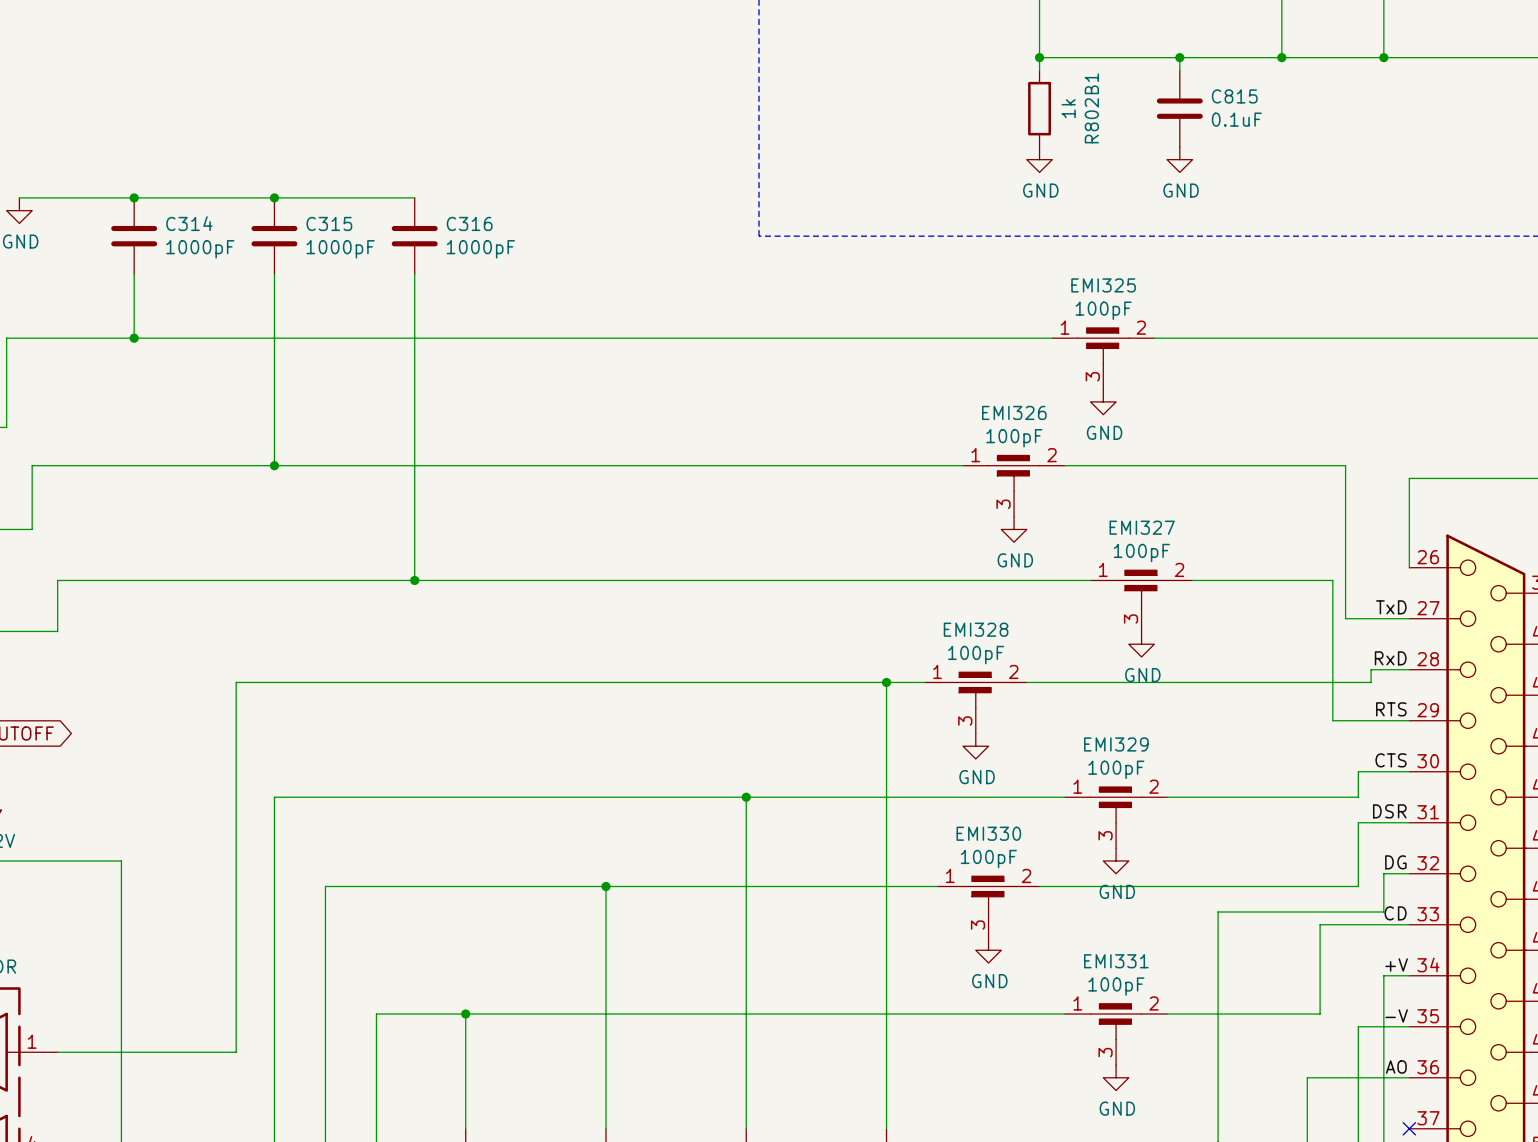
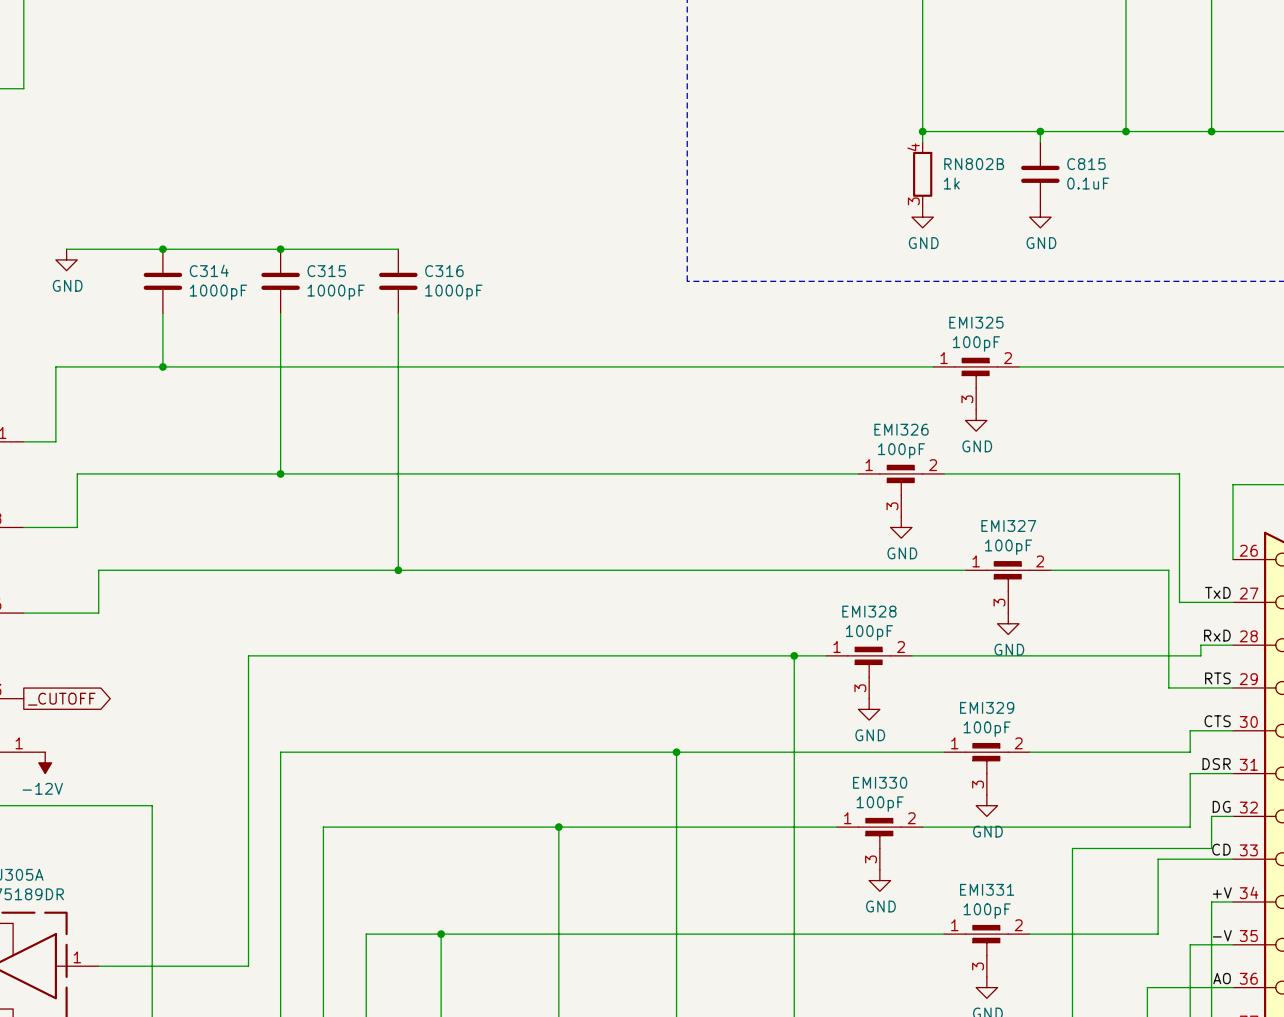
R802B1 pin number: none -> 4 (913, 147)
R802B1 value rotation: 0° (1068, 108) -> 90° clockwise (951, 183)
R802B1 name: R802B1 (1091, 108) -> RN802B (974, 164)
R802B1 pin number: none -> 3 (913, 201)

